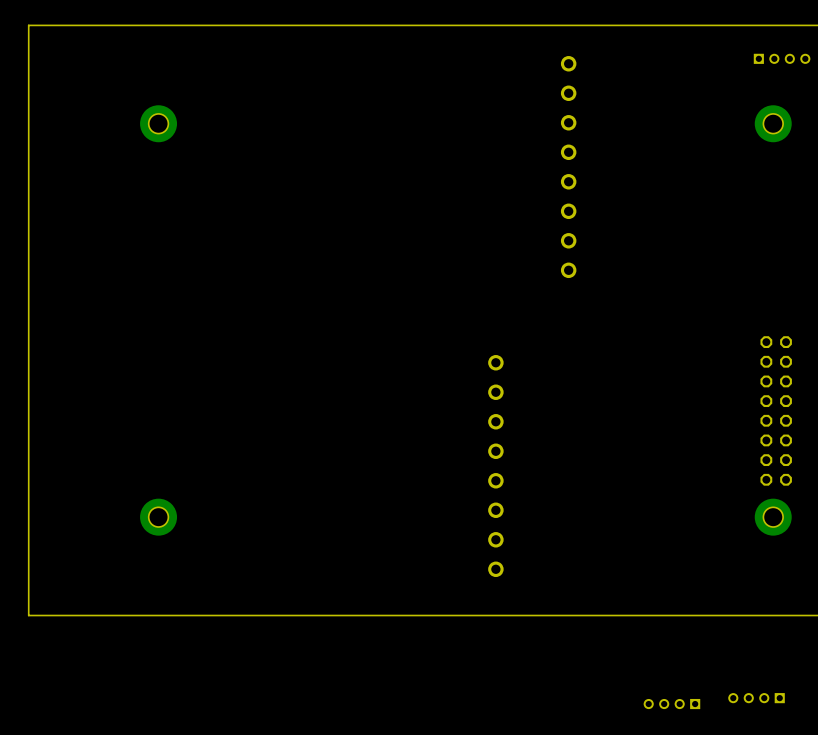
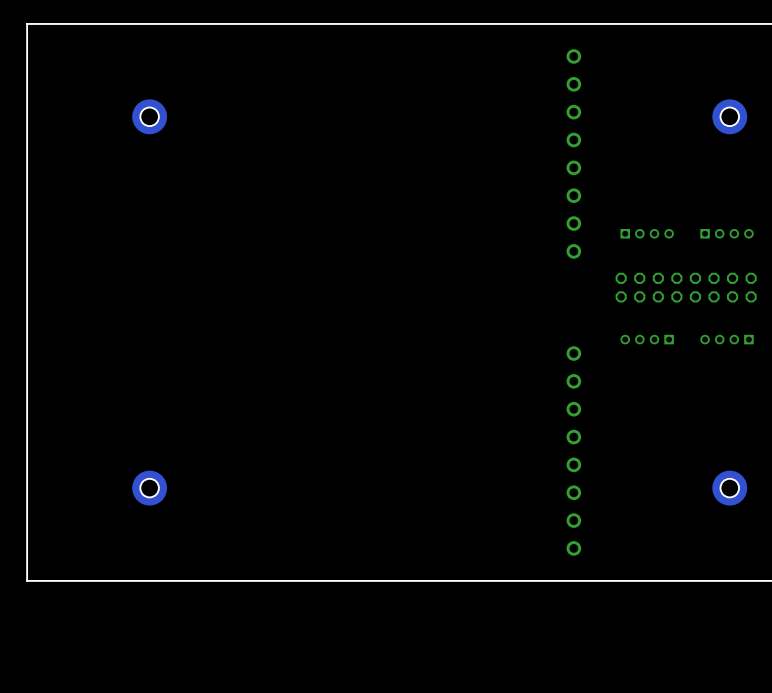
part: (782, 58) -> none
part position: (568, 167) -> (573, 153)
part: none -> (647, 233)
part: none -> (726, 233)
part: none -> (647, 339)
part: none -> (726, 339)
part rotation: 0° (776, 410) -> 90° clockwise (686, 287)
part position: (776, 410) -> (686, 287)
part position: (495, 466) -> (573, 450)
part: (756, 698) -> none
part: (671, 704) -> none

